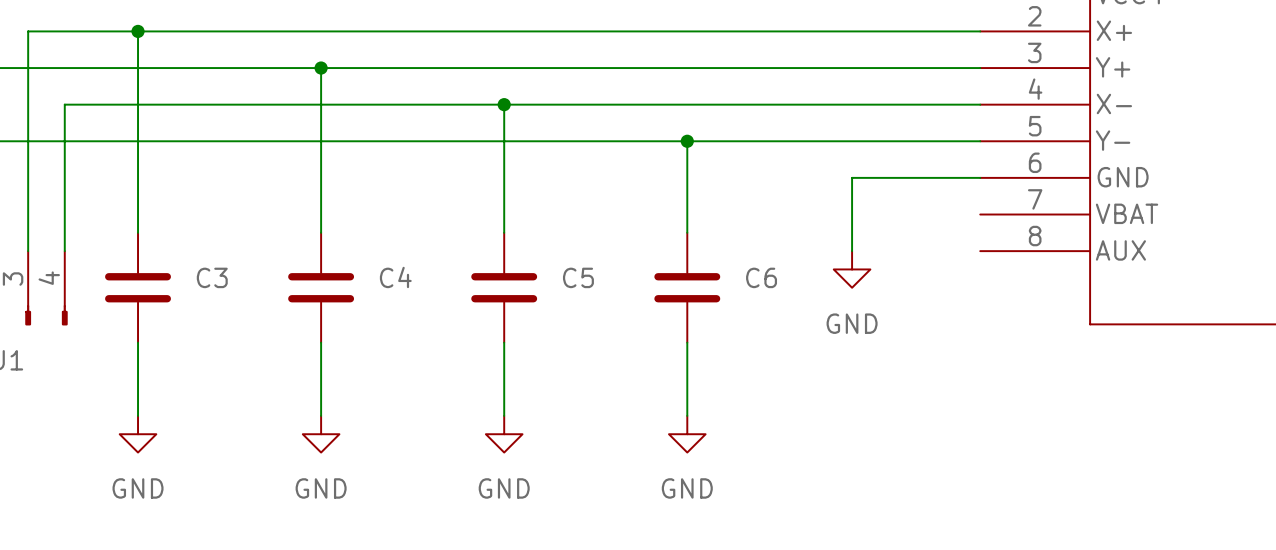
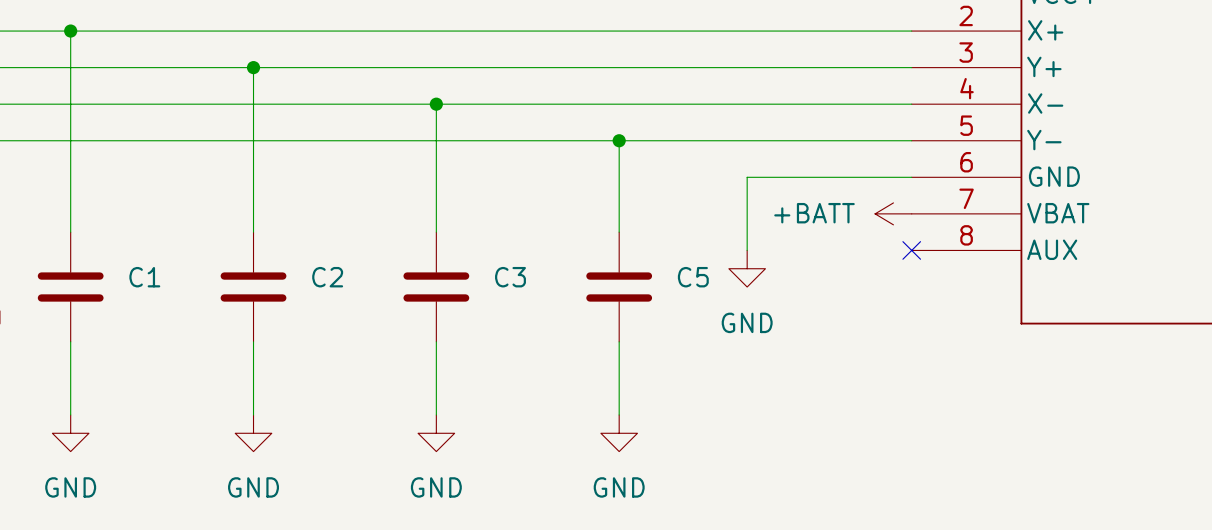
wire: (852, 177) (852, 251) -> (783, 177) (747, 177) (747, 250)
power symbol: none -> +BATT (893, 213)
no-connect mark: none -> (911, 250)
power symbol position: GND (852, 269) -> GND (747, 268)
C3 name: C3 (212, 277) -> C1 (144, 277)
C4 name: C4 (395, 277) -> C2 (327, 277)
C5 name: C5 (578, 277) -> C3 (510, 277)
C6 name: C6 (761, 277) -> C5 (693, 277)

